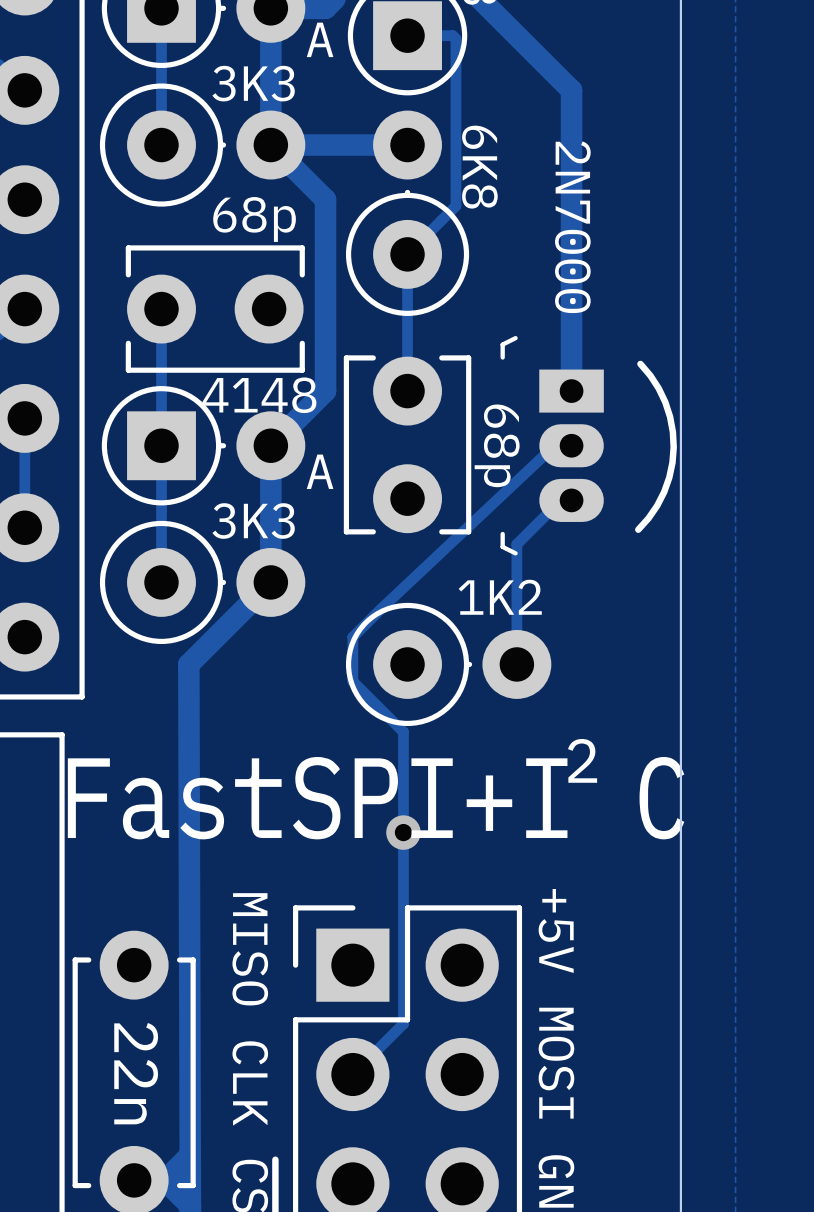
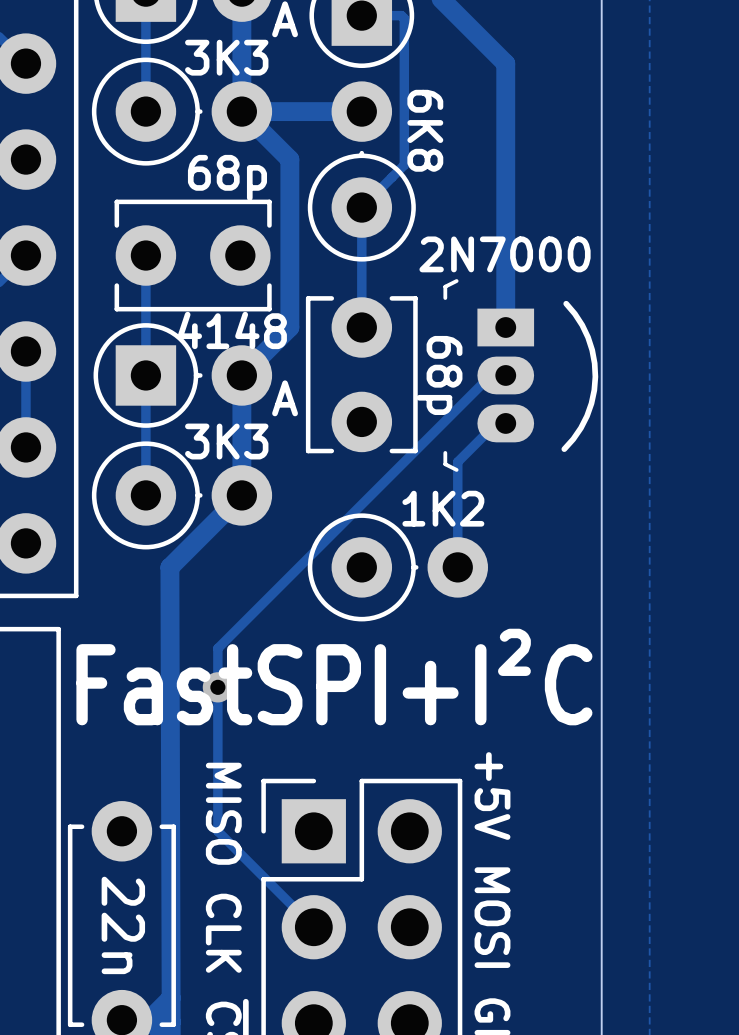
part value rotation: 0° (572, 227) -> 90° counterclockwise (505, 254)
track: (554, 445) (352, 637) (352, 681) (403, 732) (403, 1023) (352, 1074) -> (490, 375) (217, 648) (217, 831) (313, 927)
via position: (403, 832) -> (217, 687)

